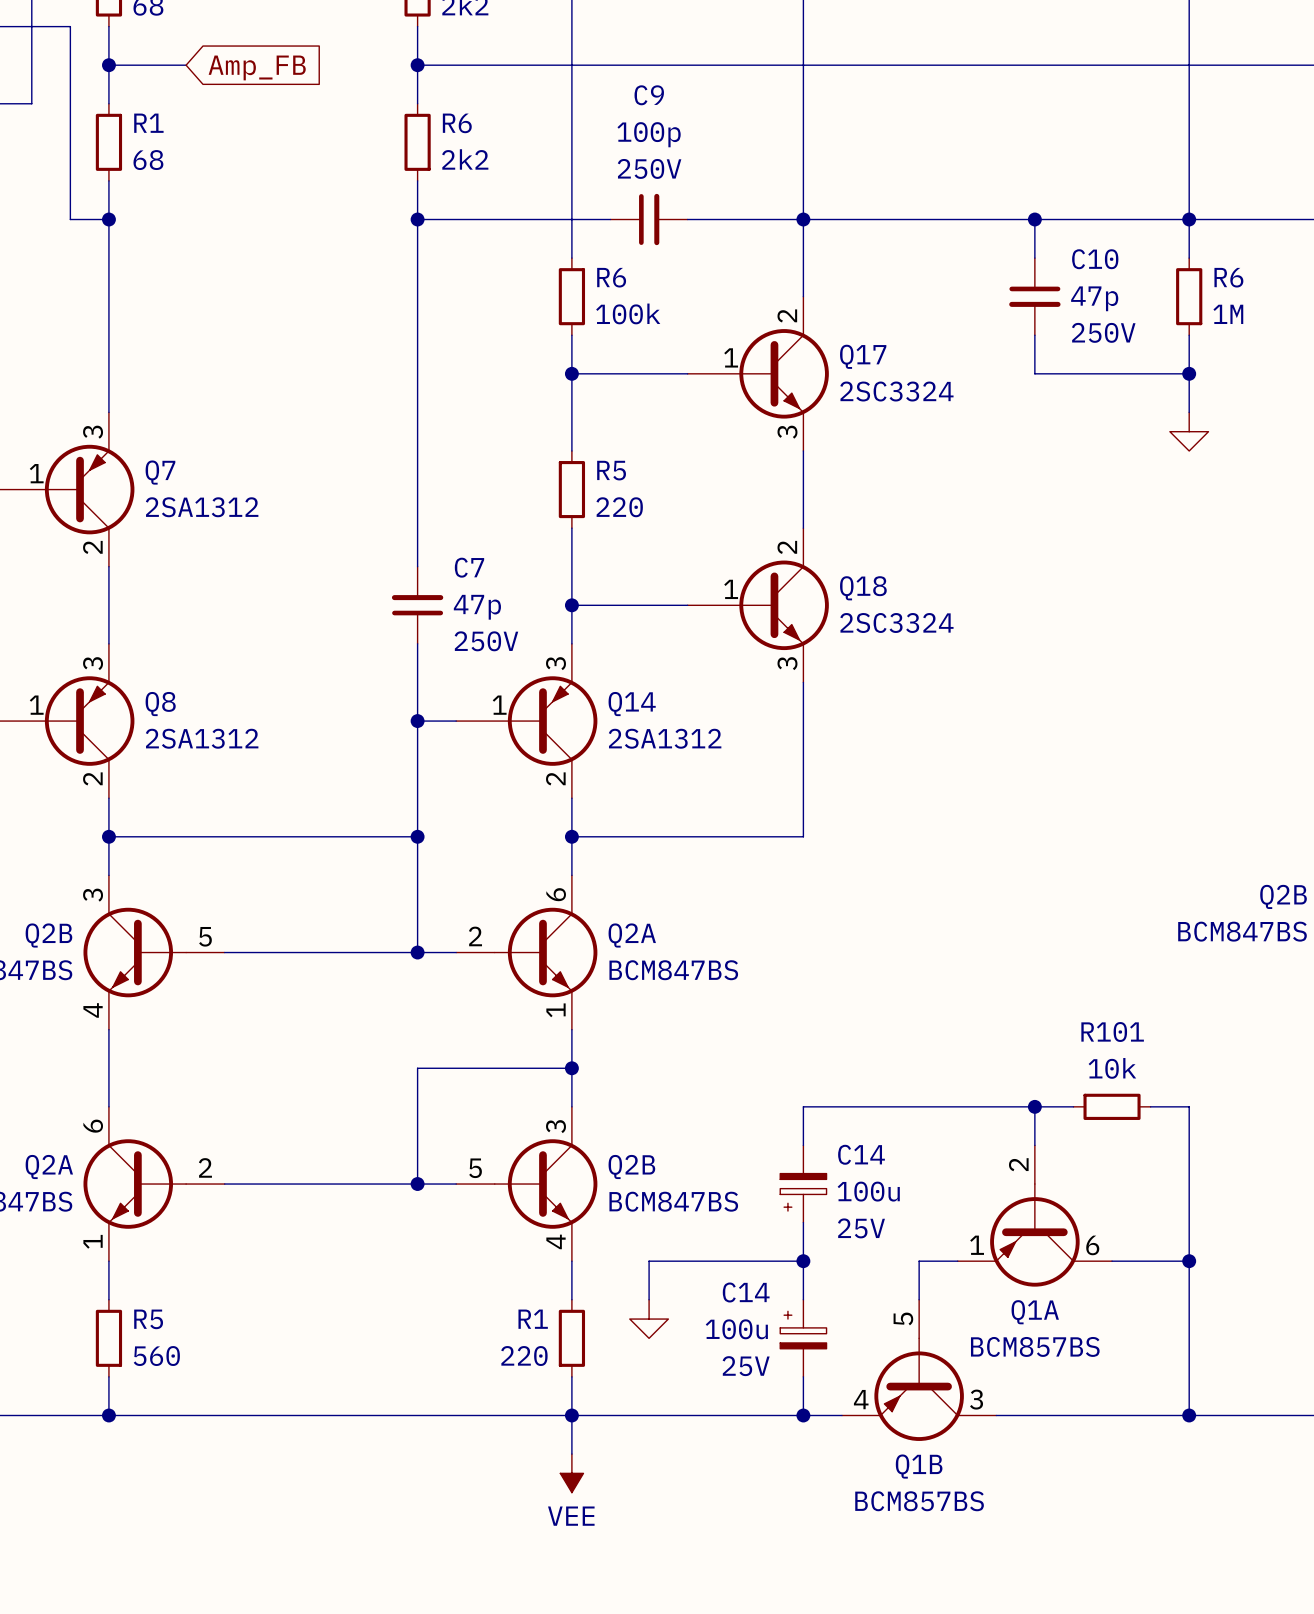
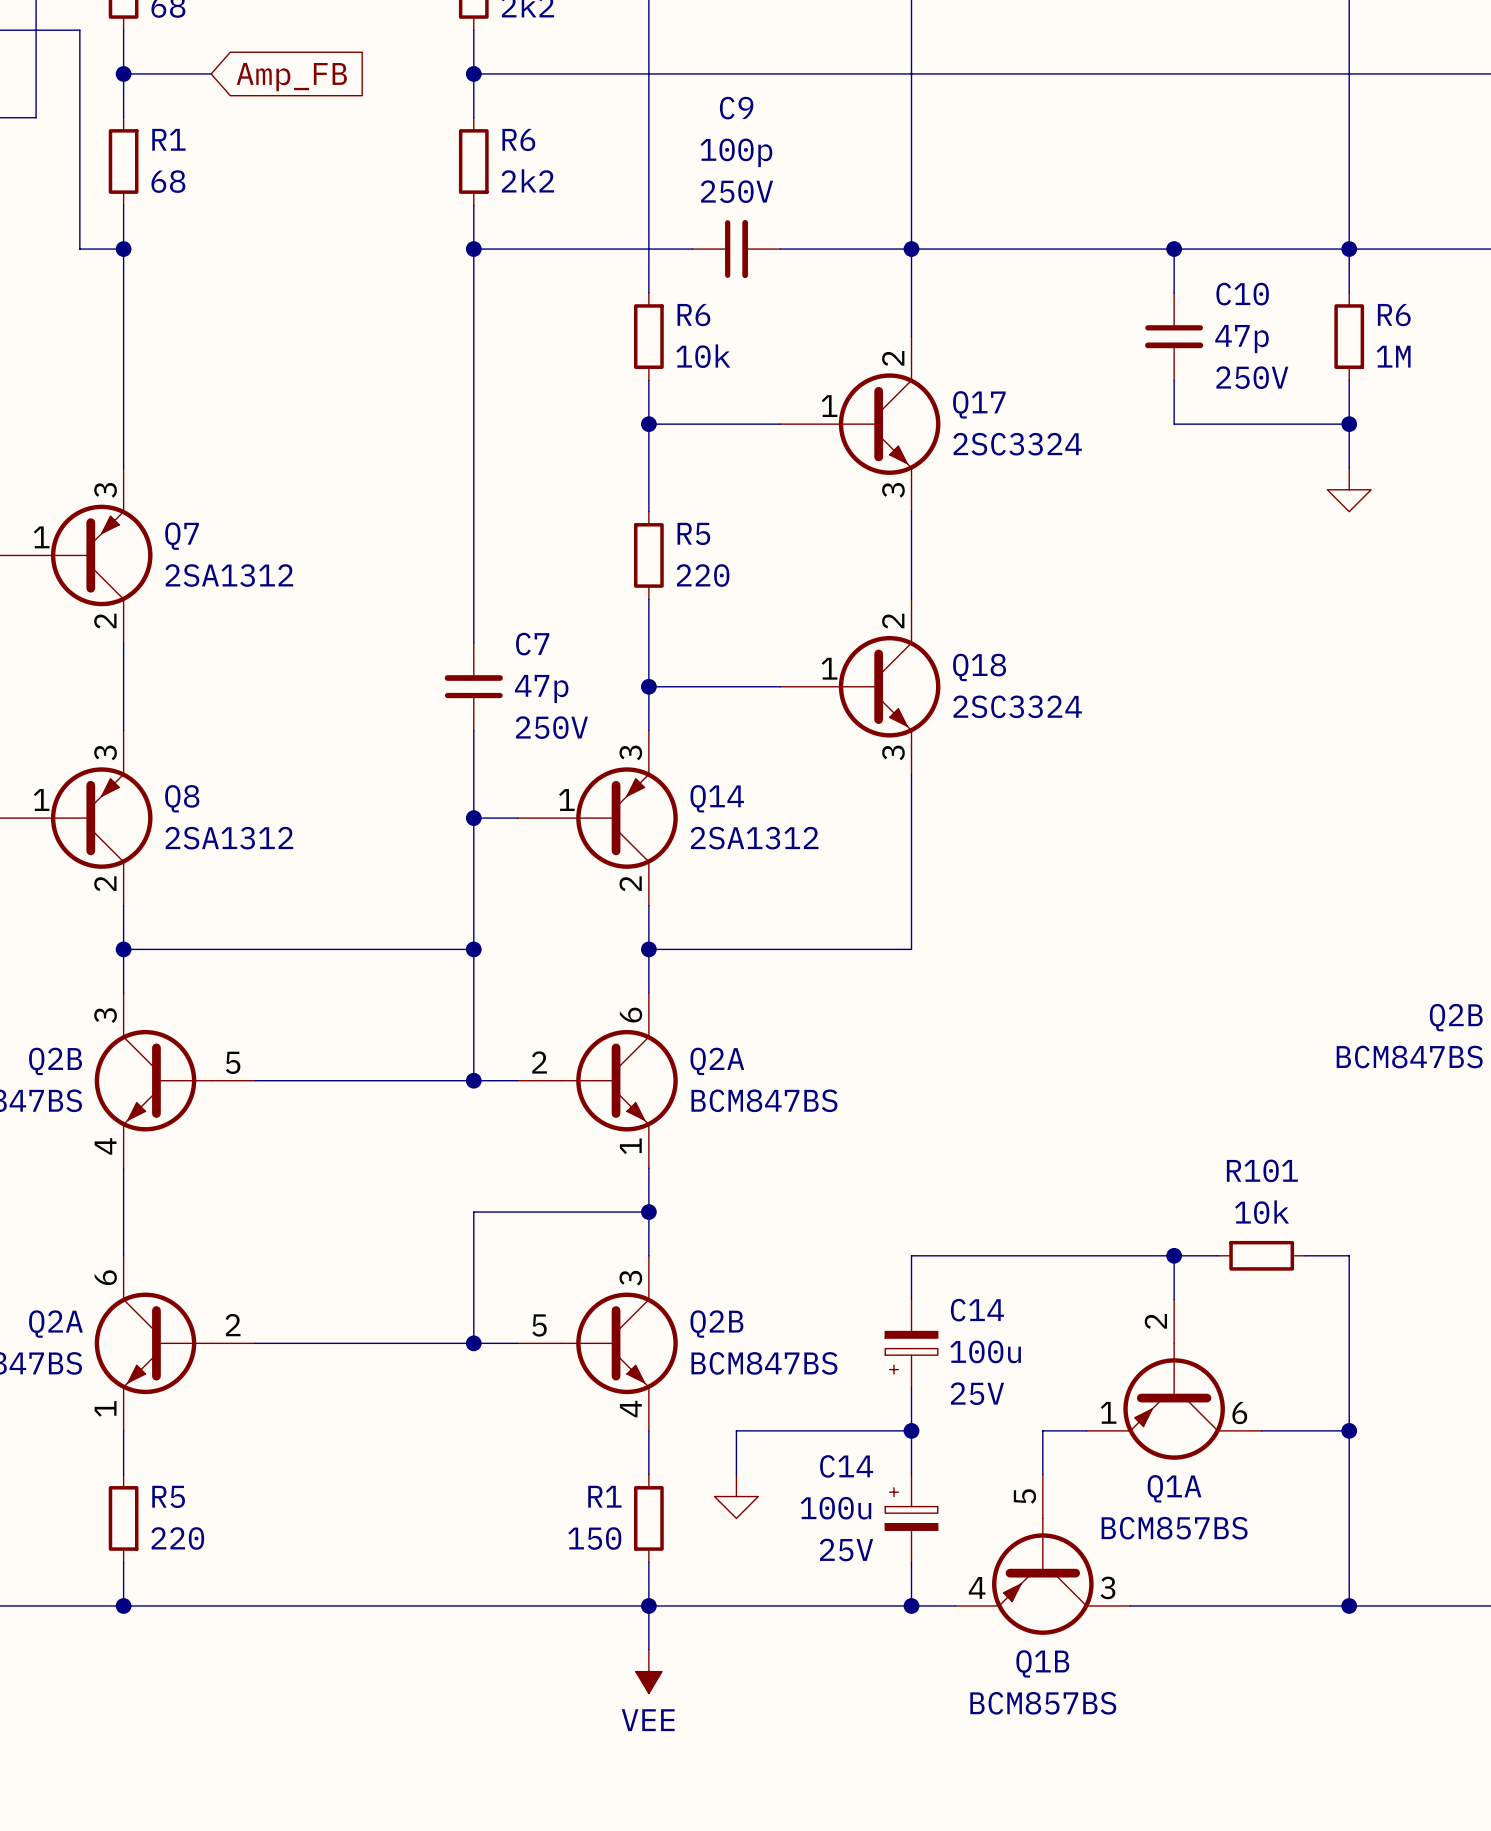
R6 value: 100k (628, 313) -> 10k (703, 356)
R5 value: 560 (156, 1356) -> 220 (177, 1538)
R1 value: 220 (524, 1356) -> 150 (594, 1538)

